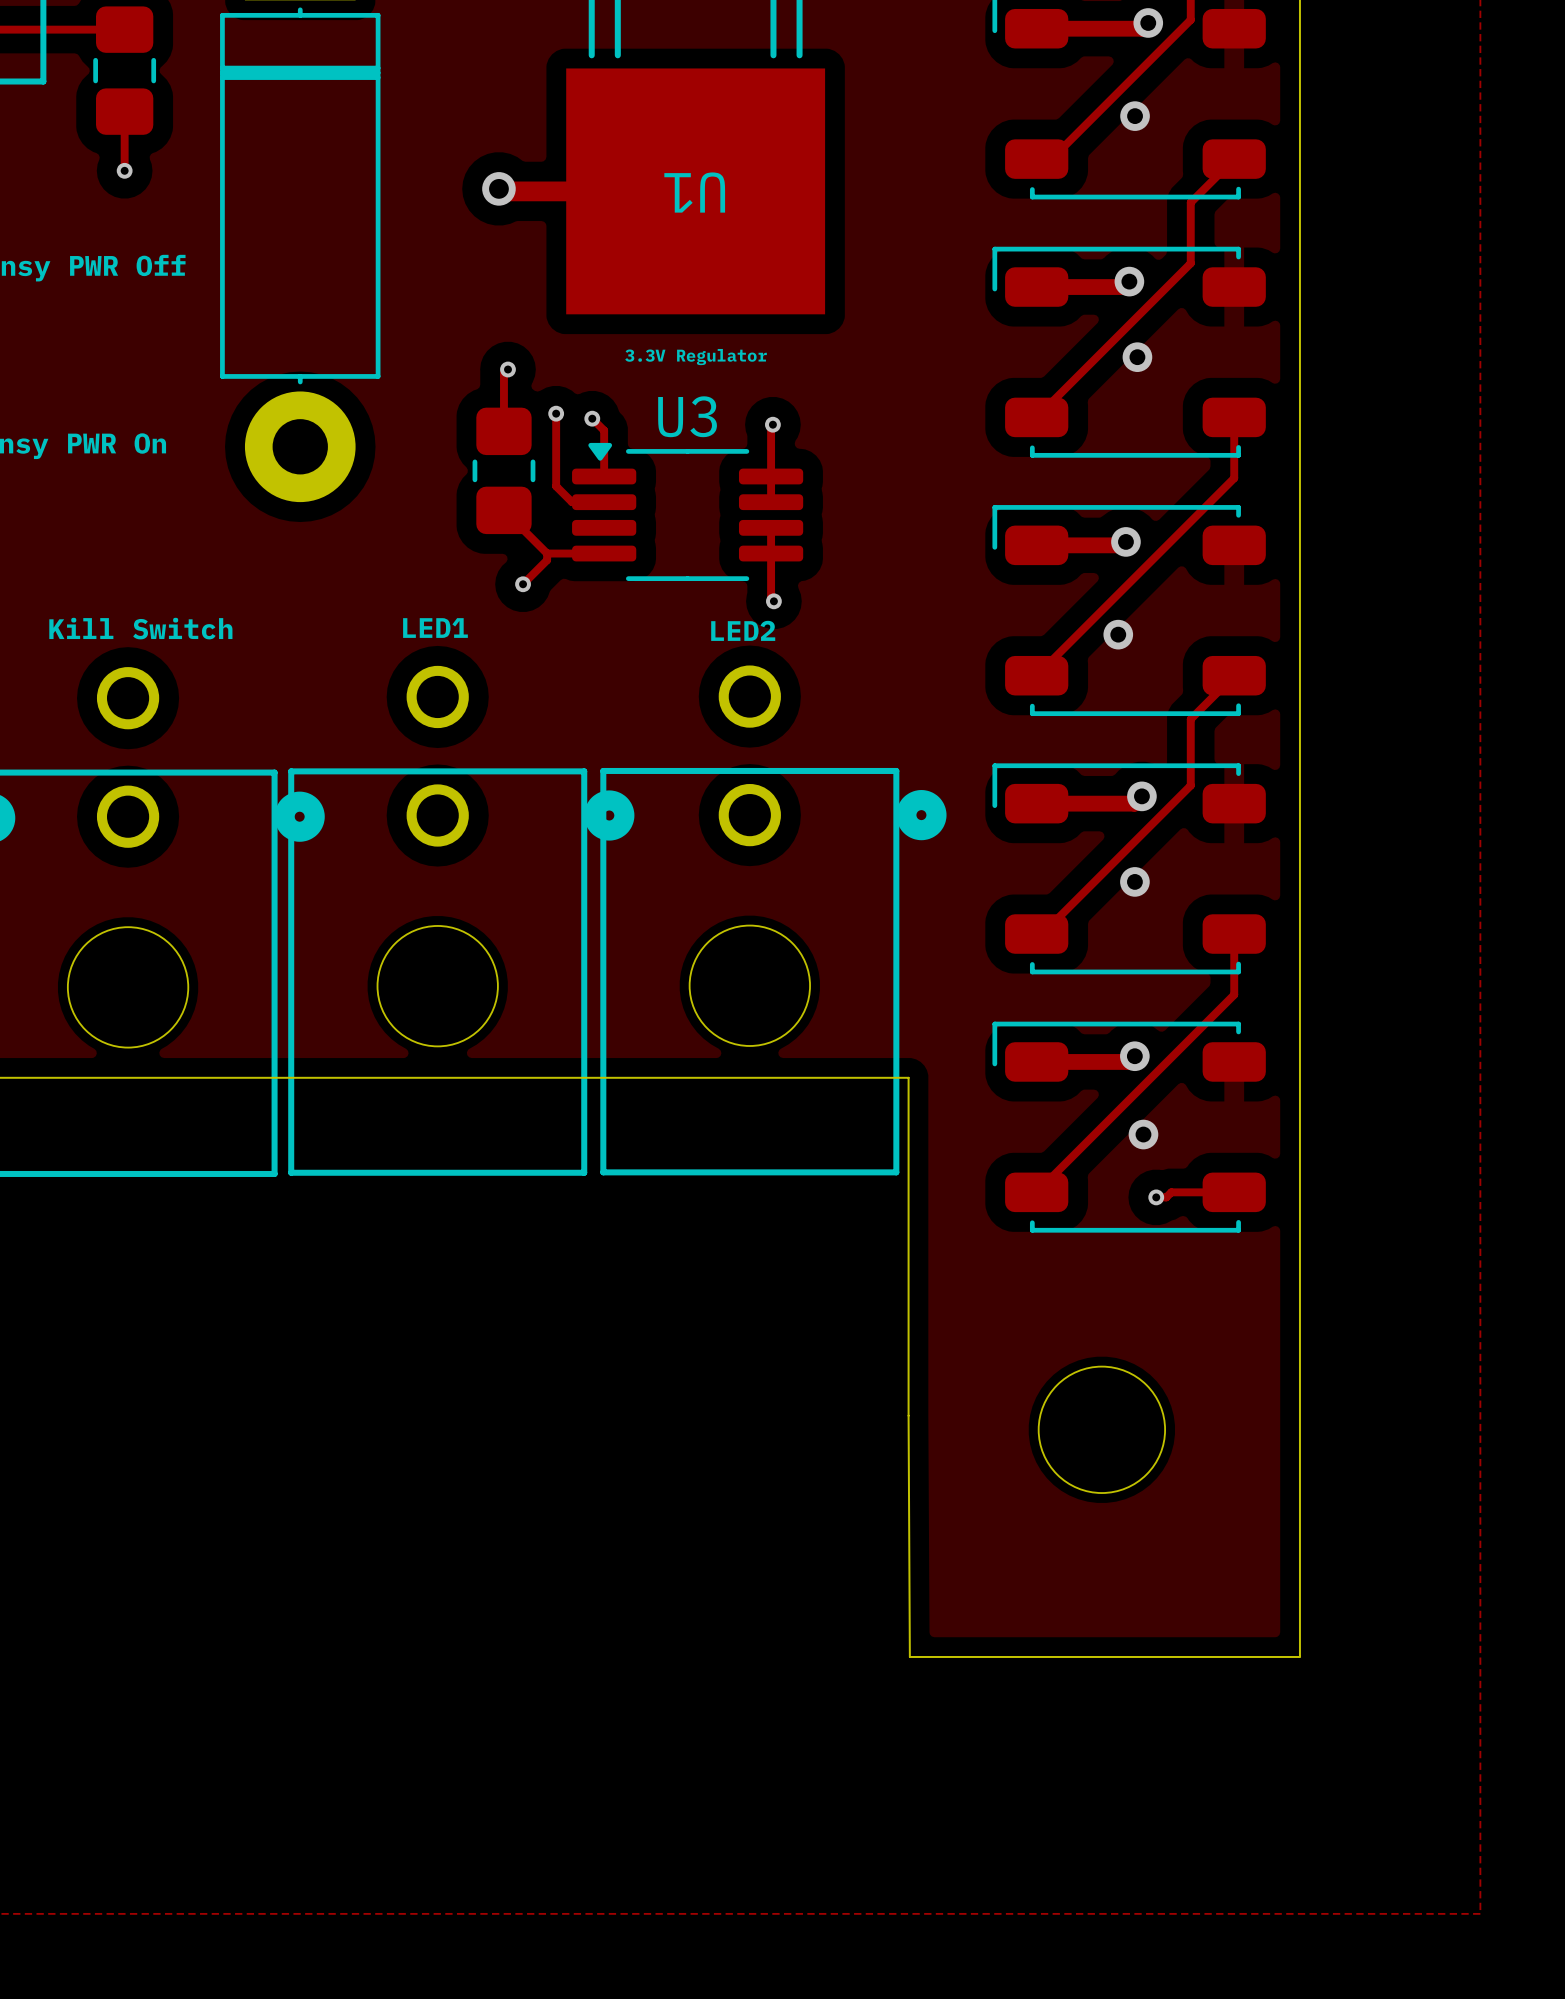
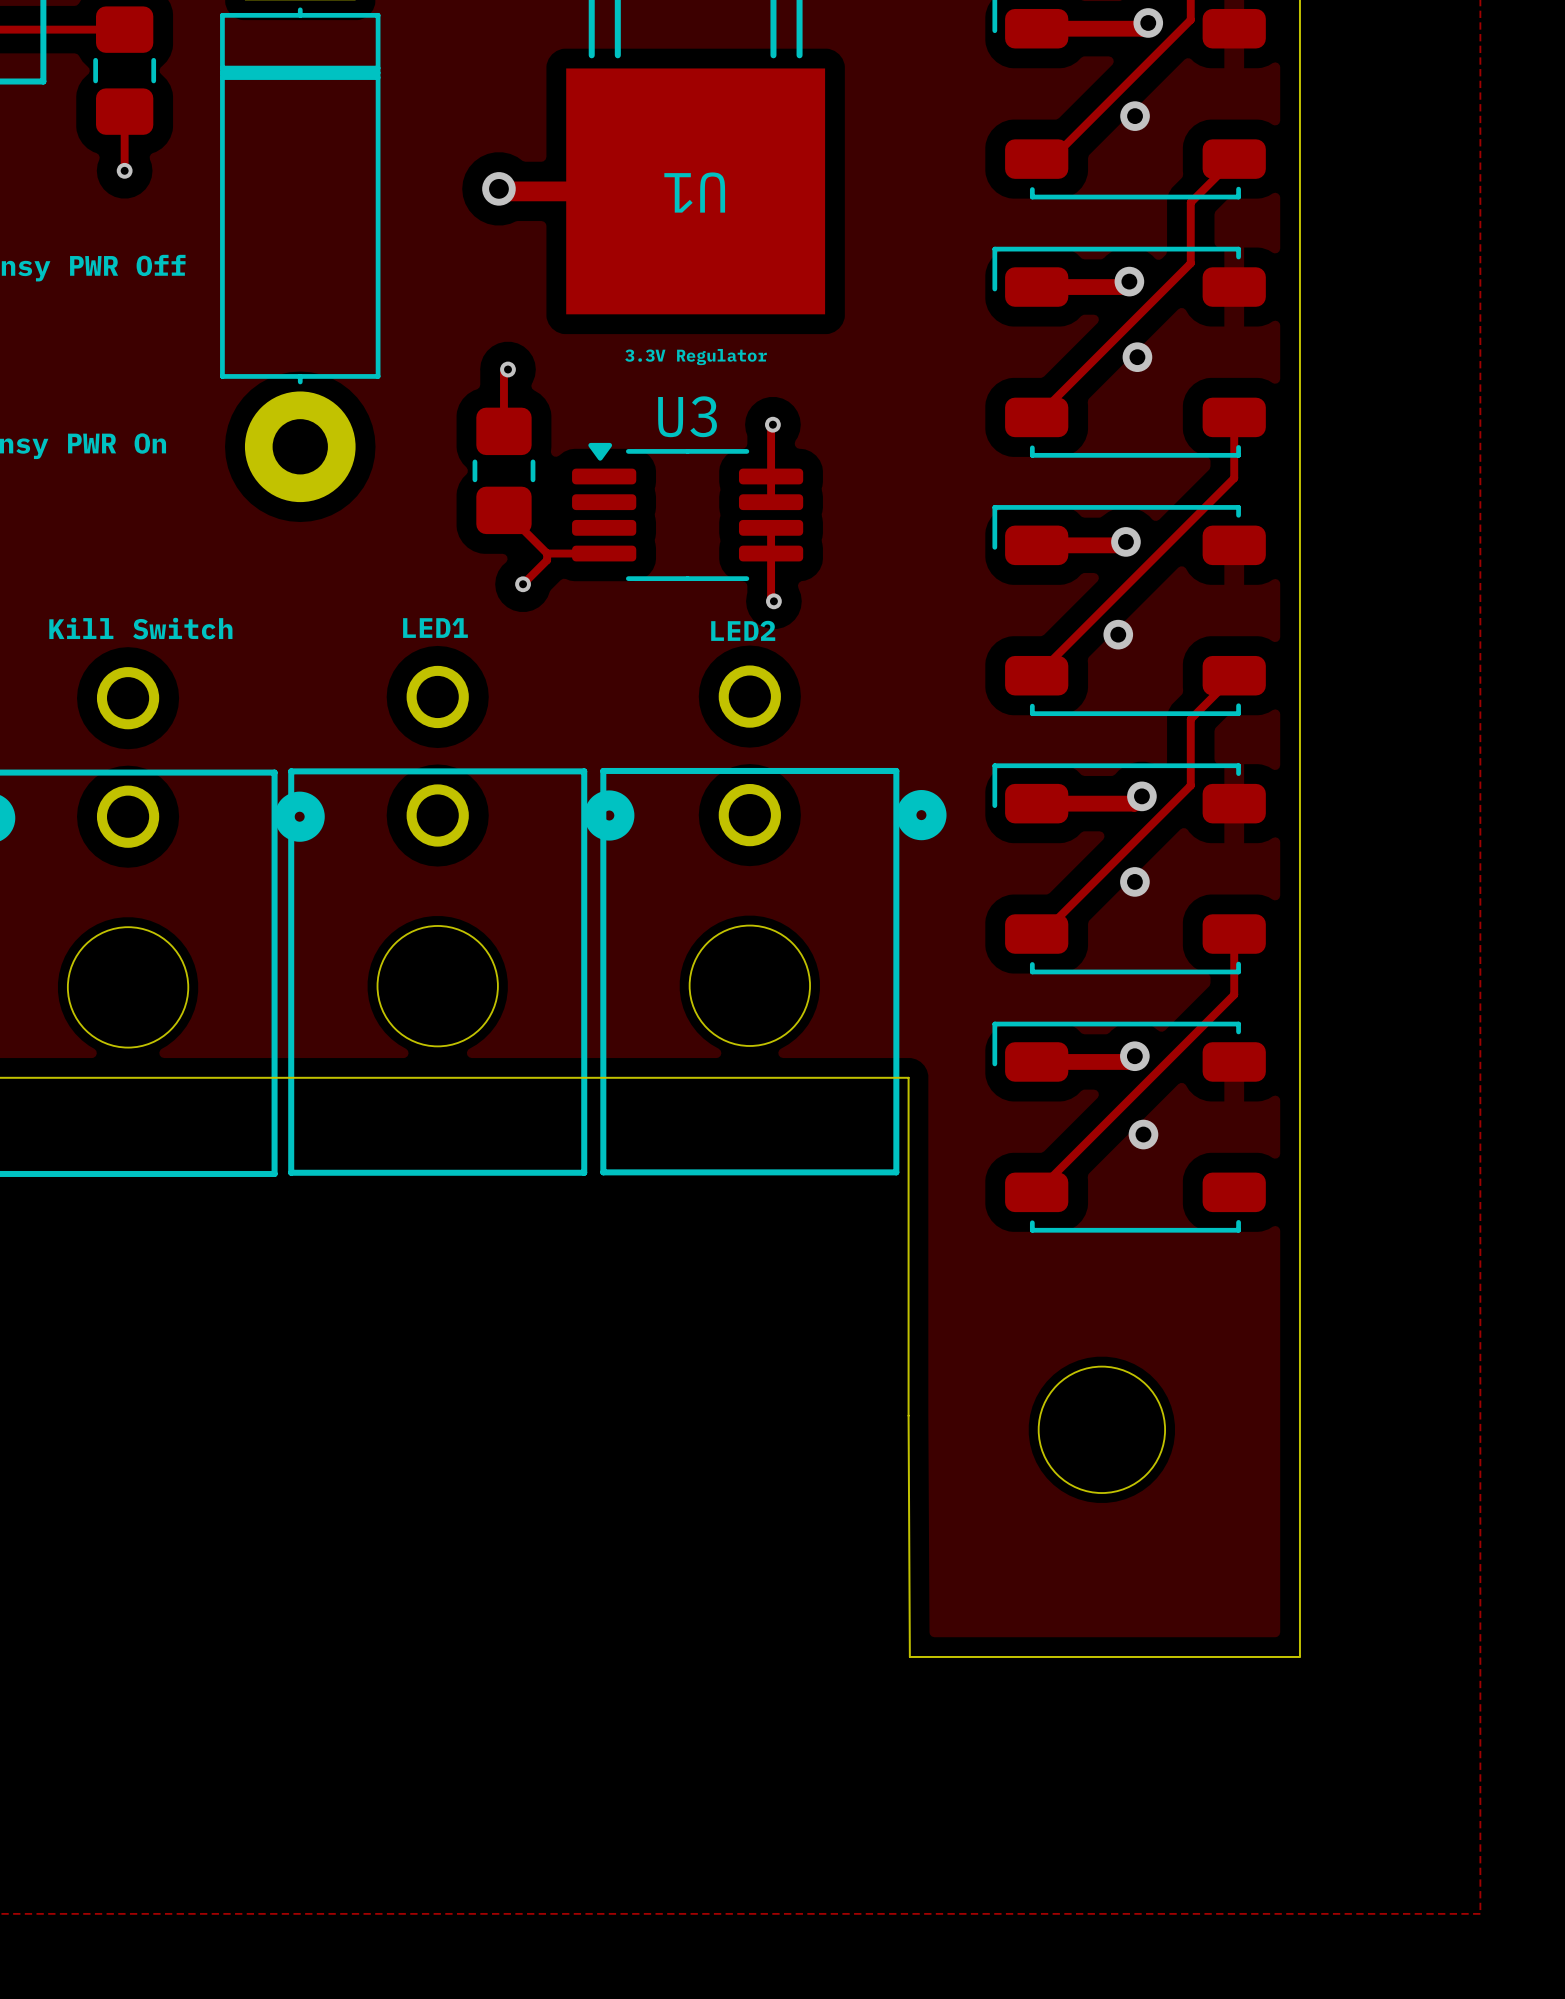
track: (556, 413) (556, 486) (572, 502) (604, 502) -> none
via: (556, 413) -> none
track: (592, 418) (604, 430) (604, 476) -> none
via: (592, 418) -> none
track: (1234, 1192) (1171, 1192) (1166, 1197) (1156, 1197) -> none
via: (1156, 1197) -> none

